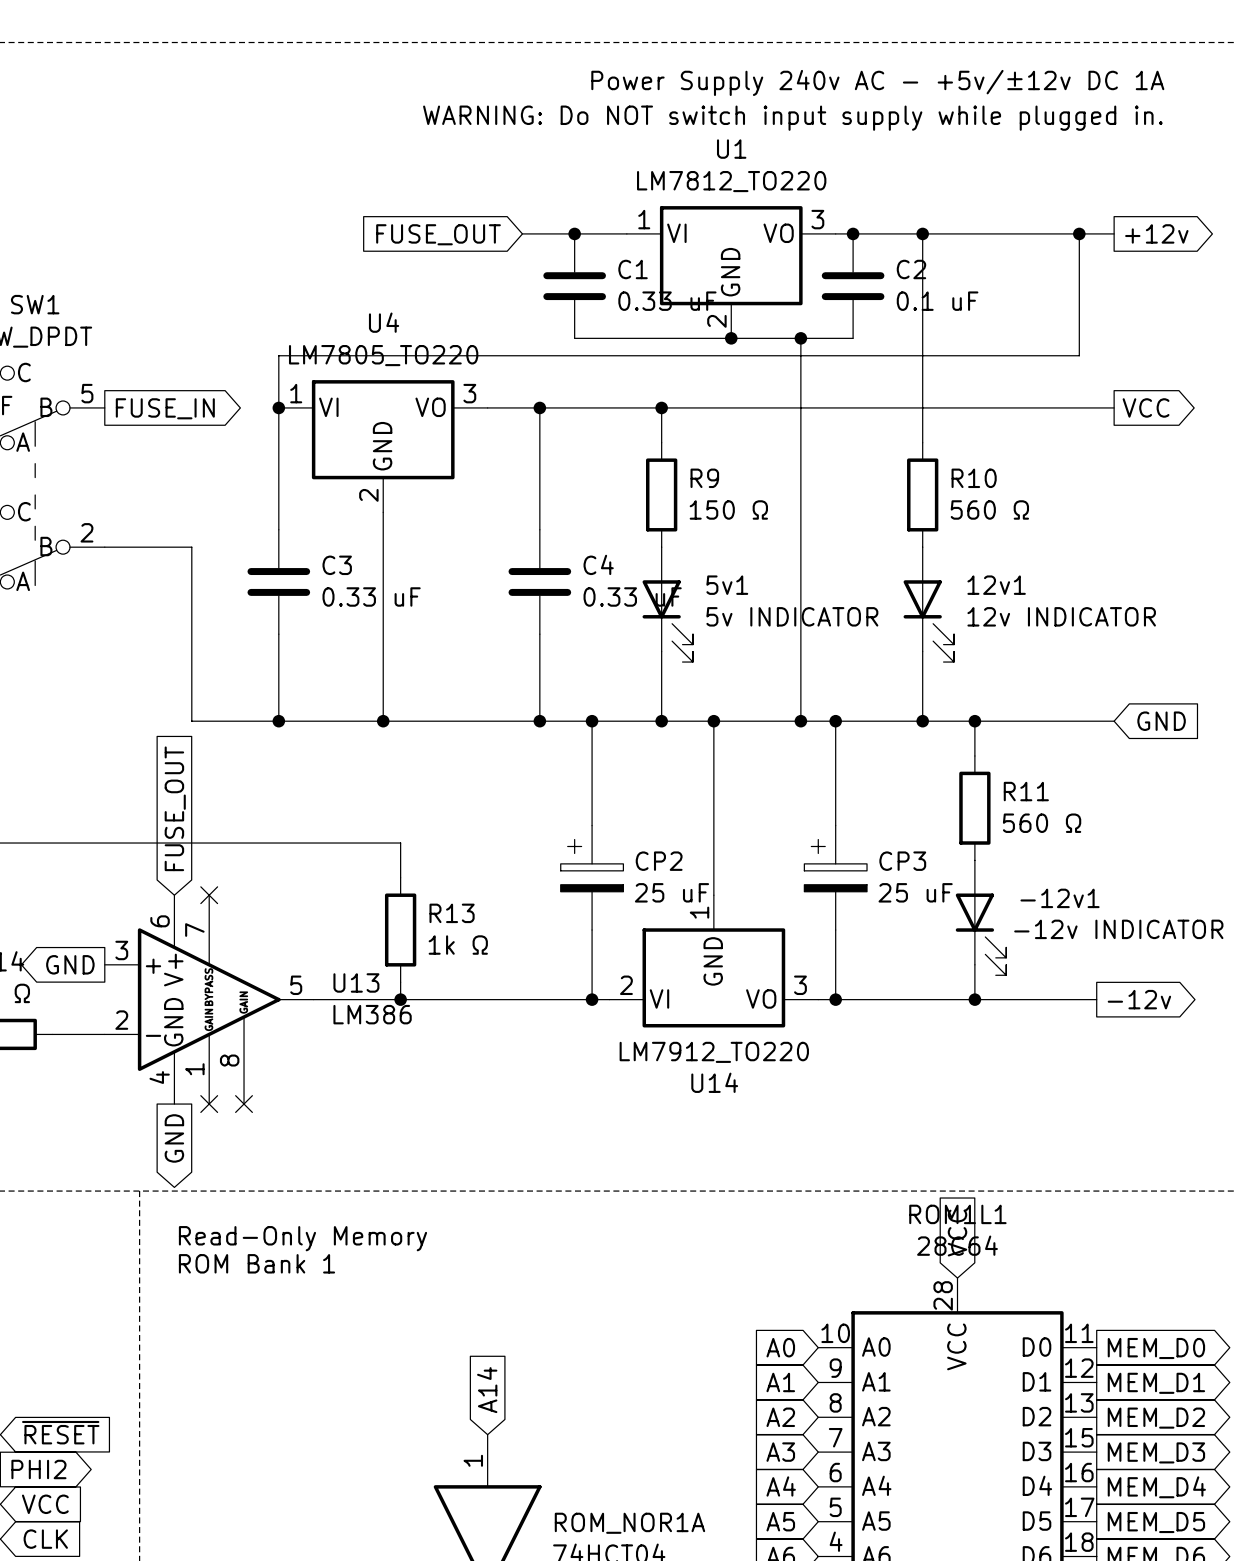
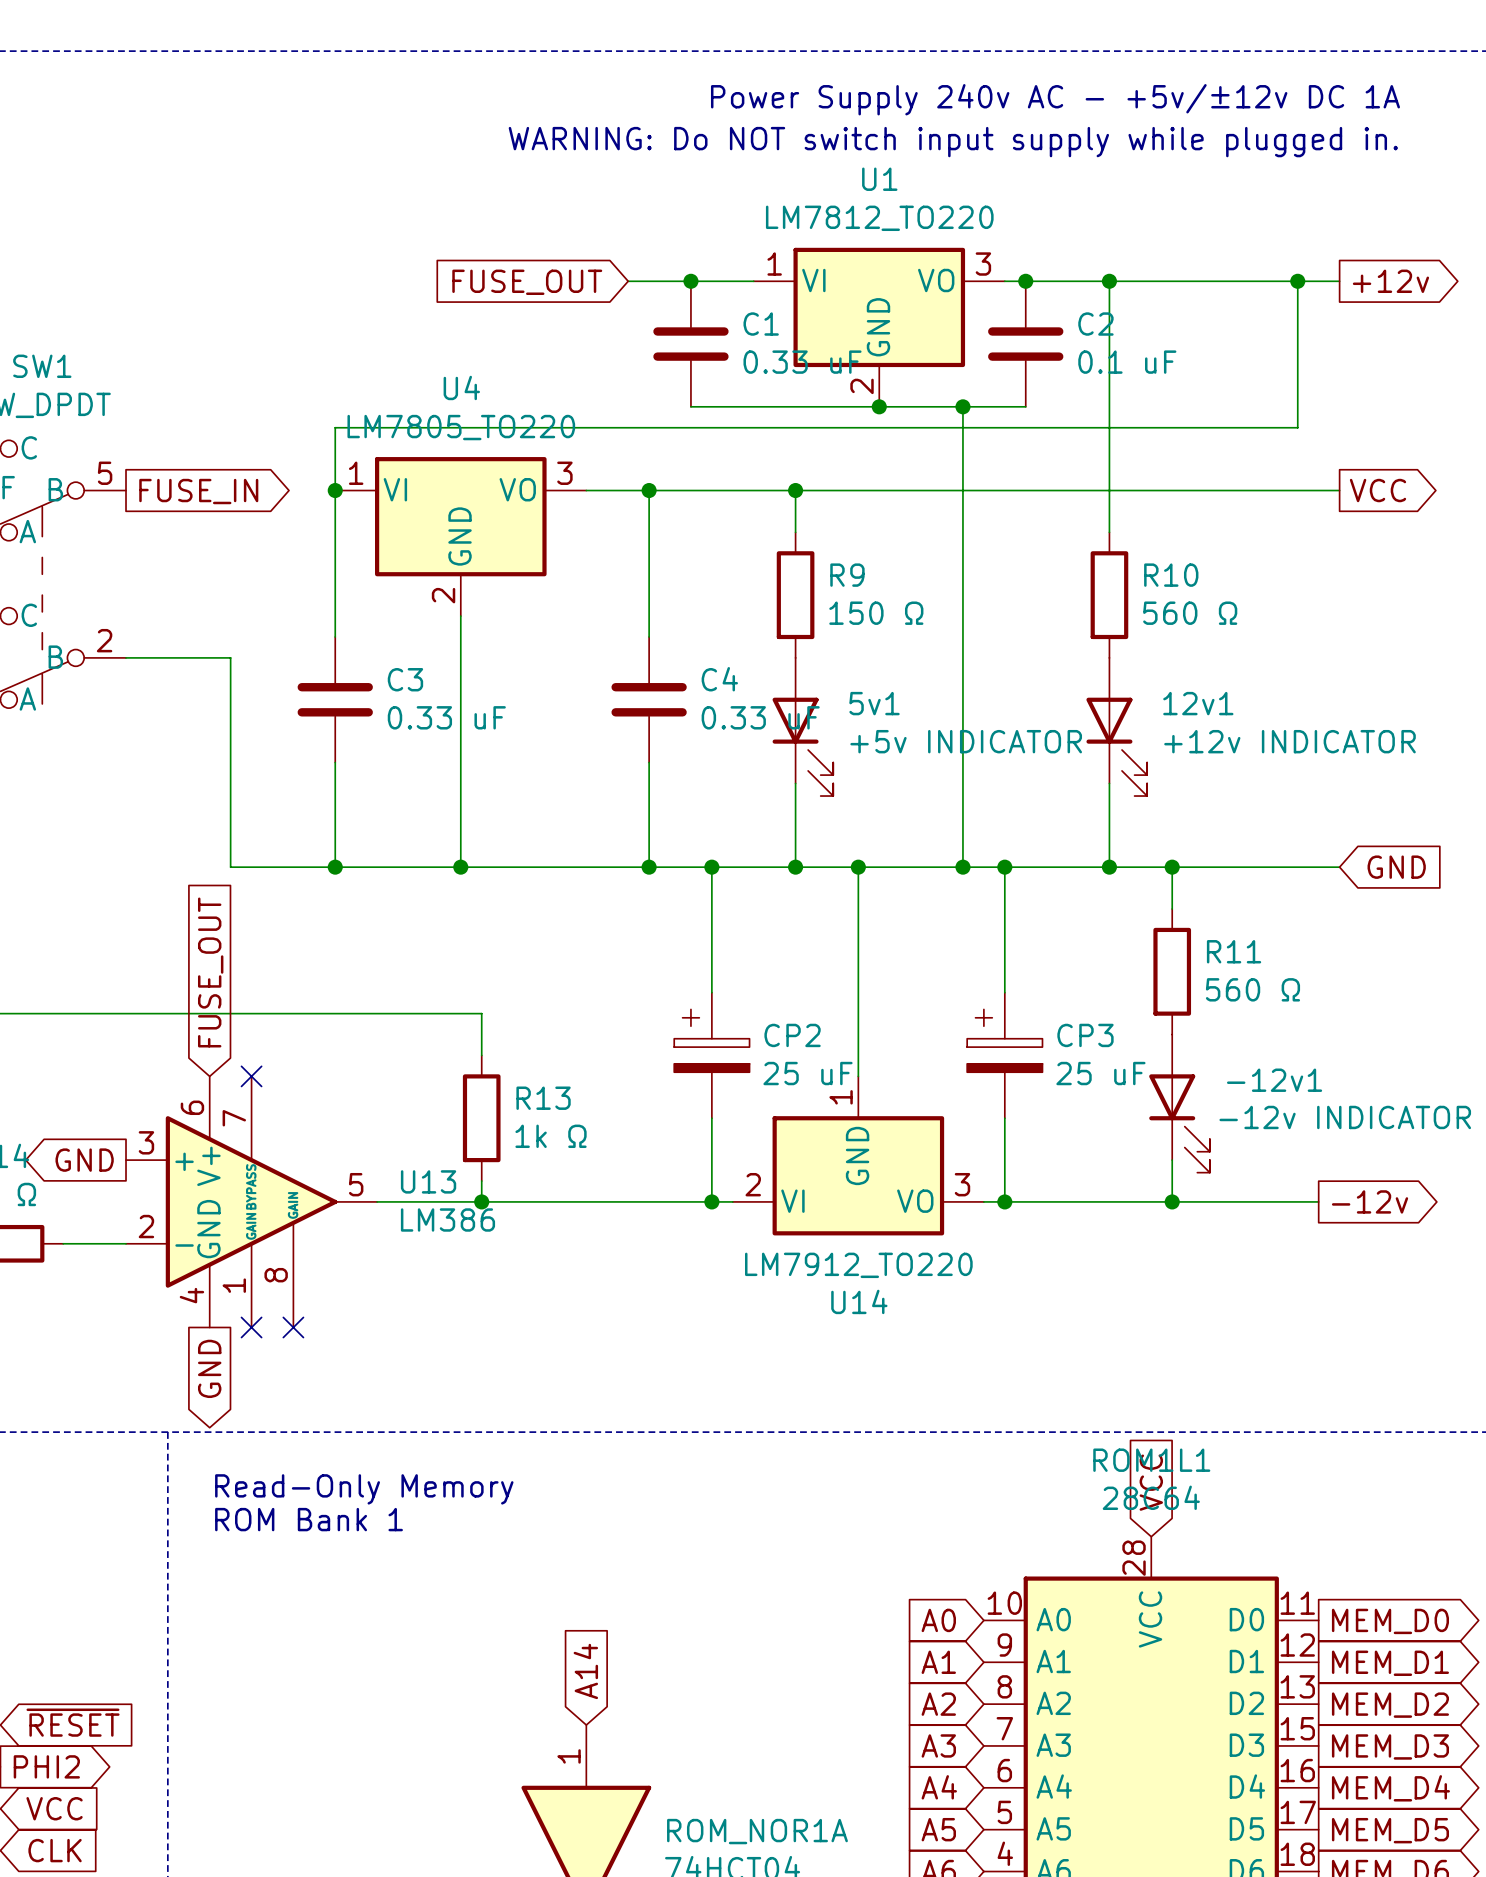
5v1 value: 5v INDICATOR (792, 616) -> +5v INDICATOR (966, 741)
12v1 value: 12v INDICATOR (1061, 616) -> +12v INDICATOR (1290, 741)

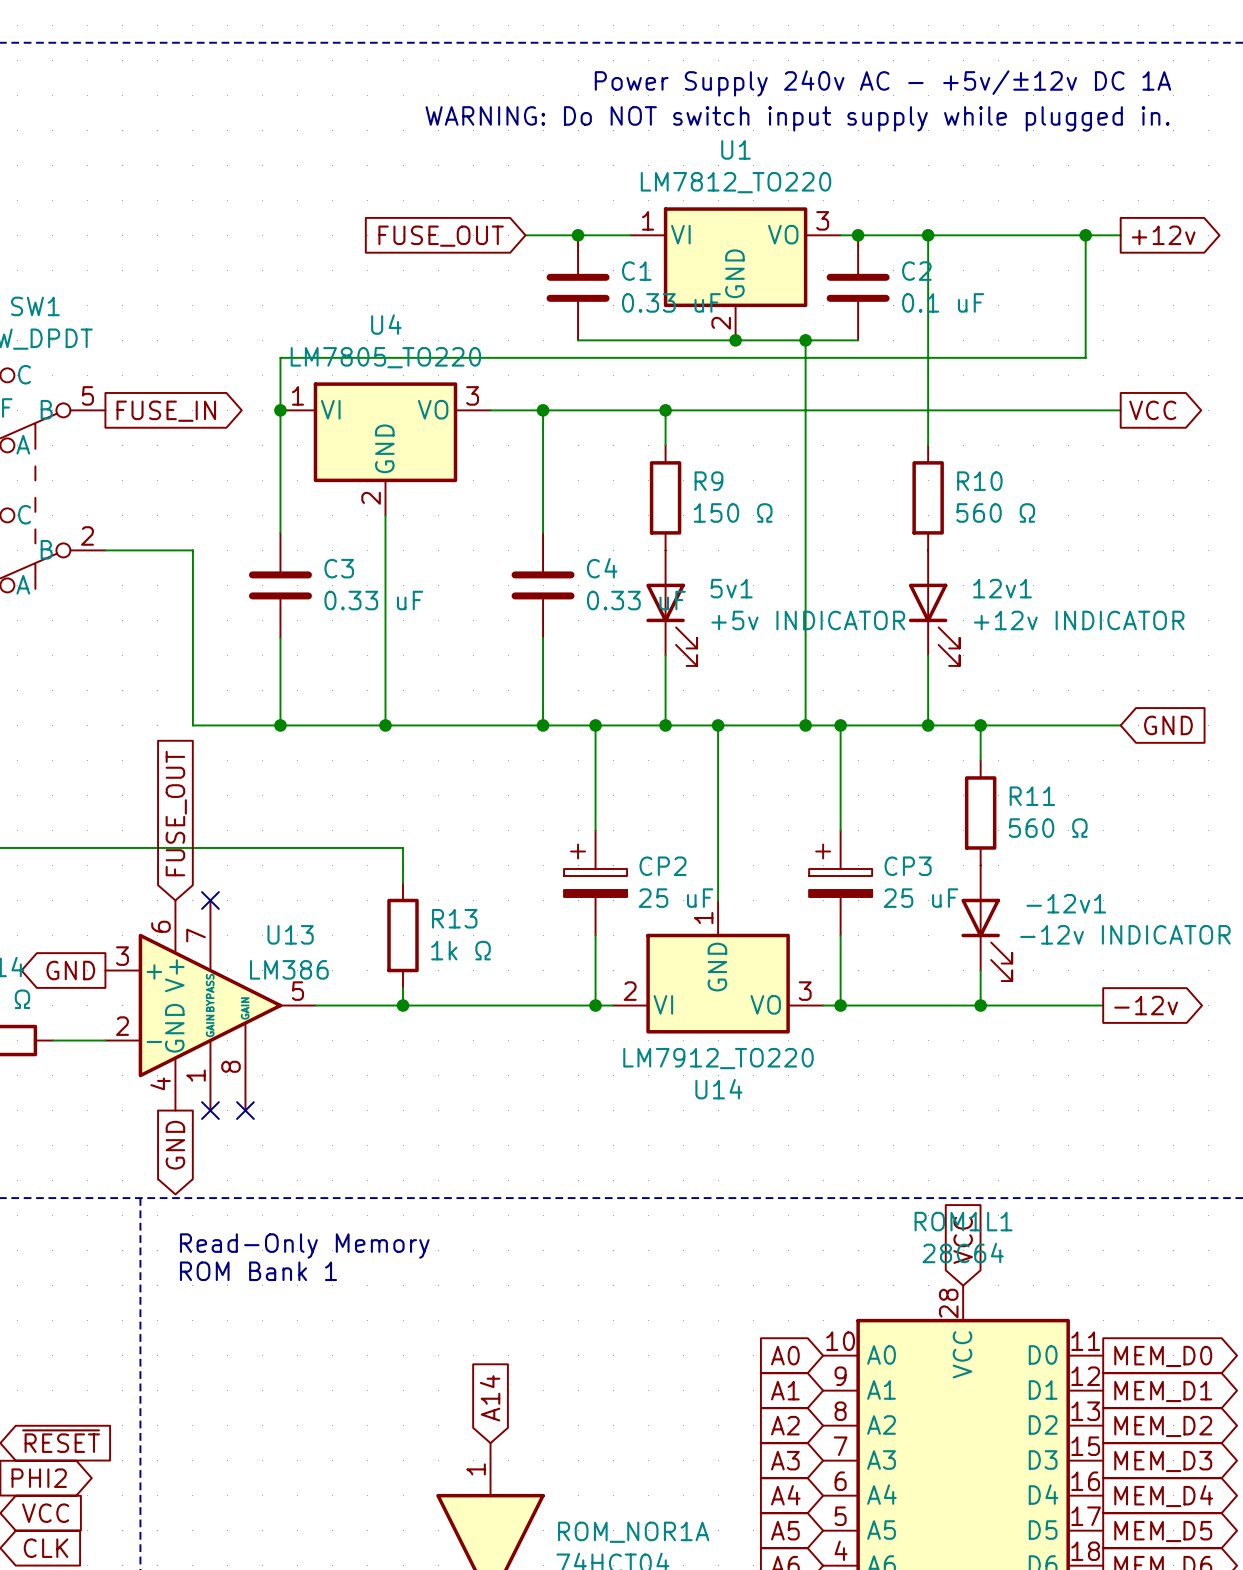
U13 name position: U13 (428, 1181) -> U13 (290, 934)
U13 value position: LM386 (447, 1219) -> LM386 (289, 969)

